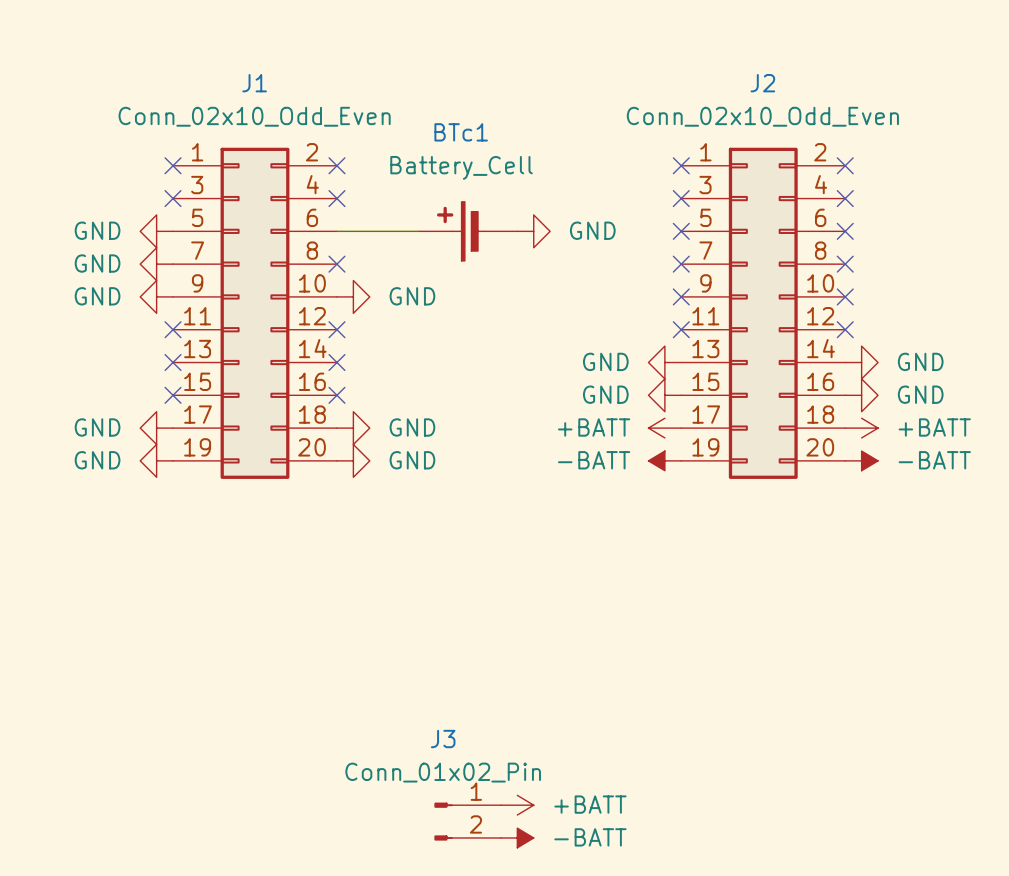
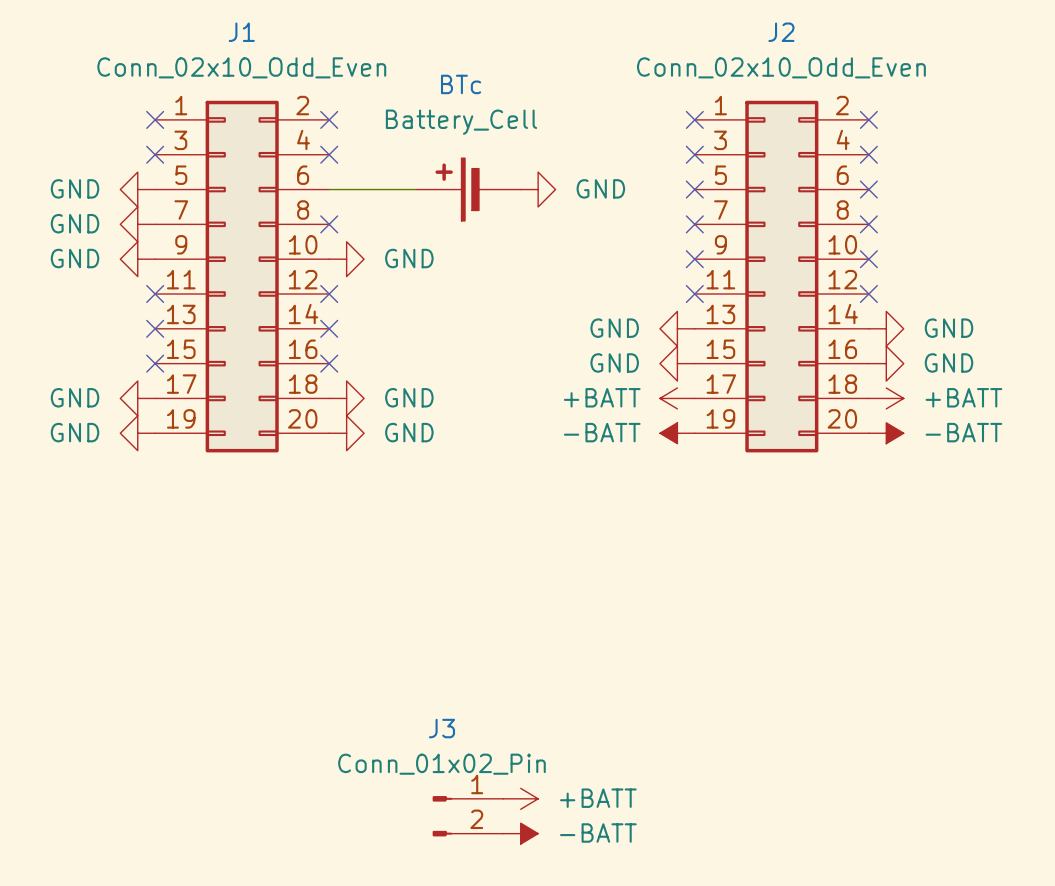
BTc1 name: BTc1 (461, 132) -> BTc (461, 84)

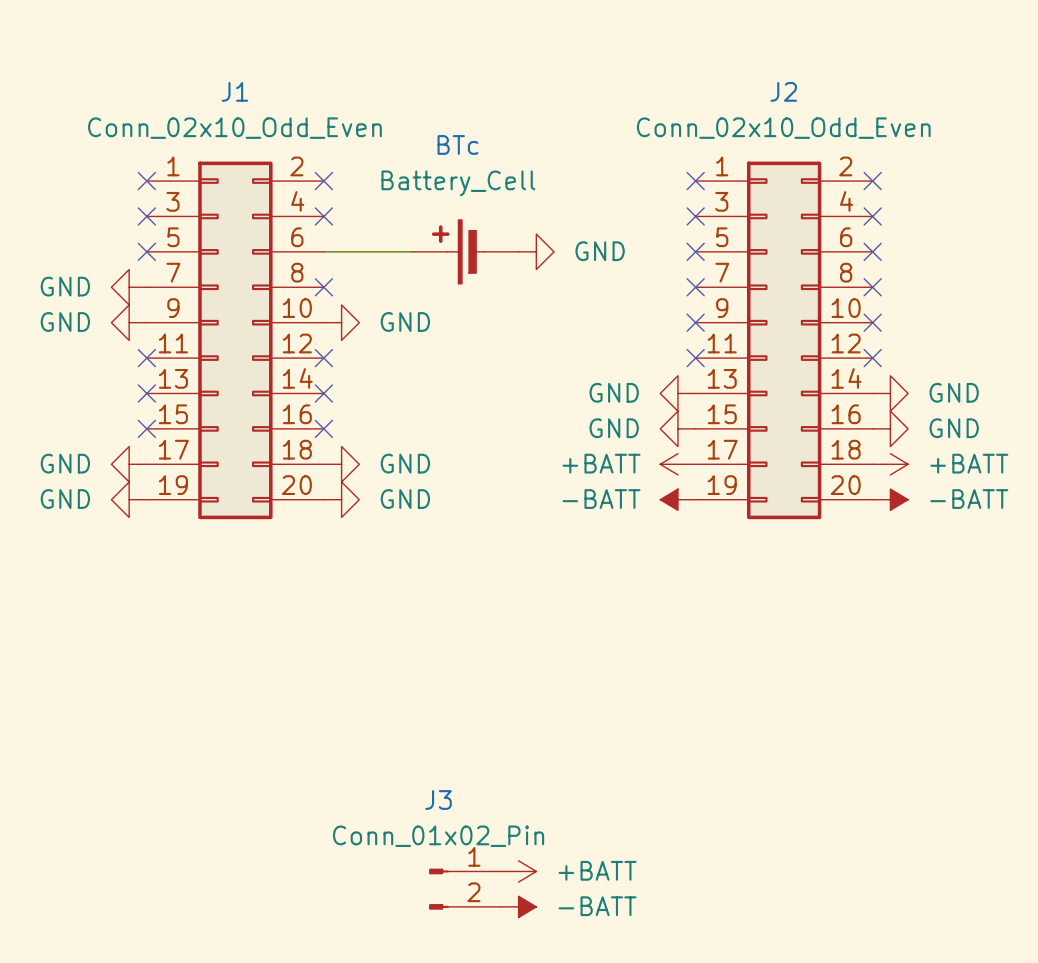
power symbol: GND (137, 189) -> none
no-connect mark: none -> (146, 251)

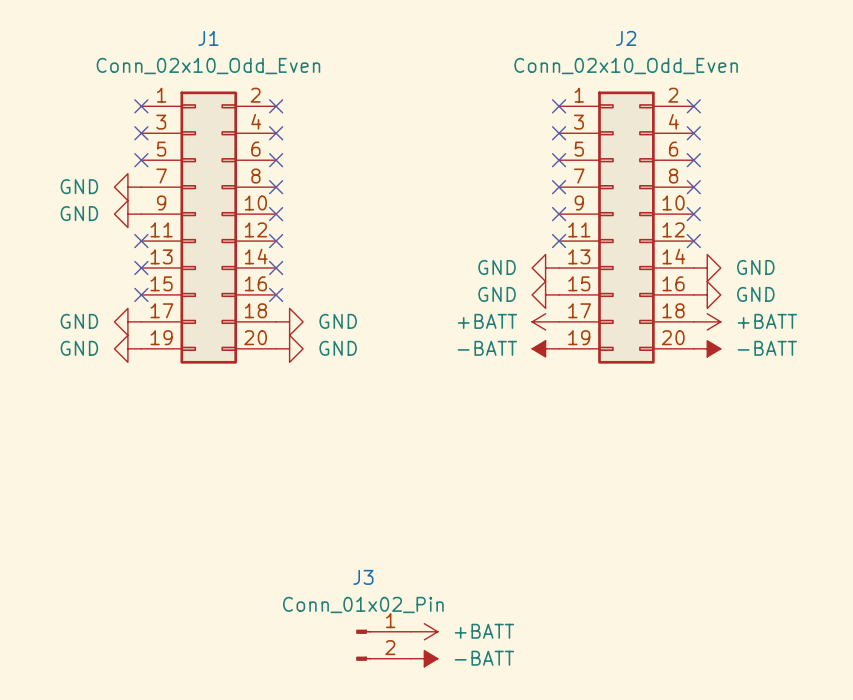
wire: (323, 251) (412, 251) -> none
no-connect mark: none -> (276, 160)
BTc: Battery_Cell (465, 251) -> none
power symbol: GND (536, 251) -> none
no-connect mark: none -> (276, 214)
power symbol: GND (341, 322) -> none

